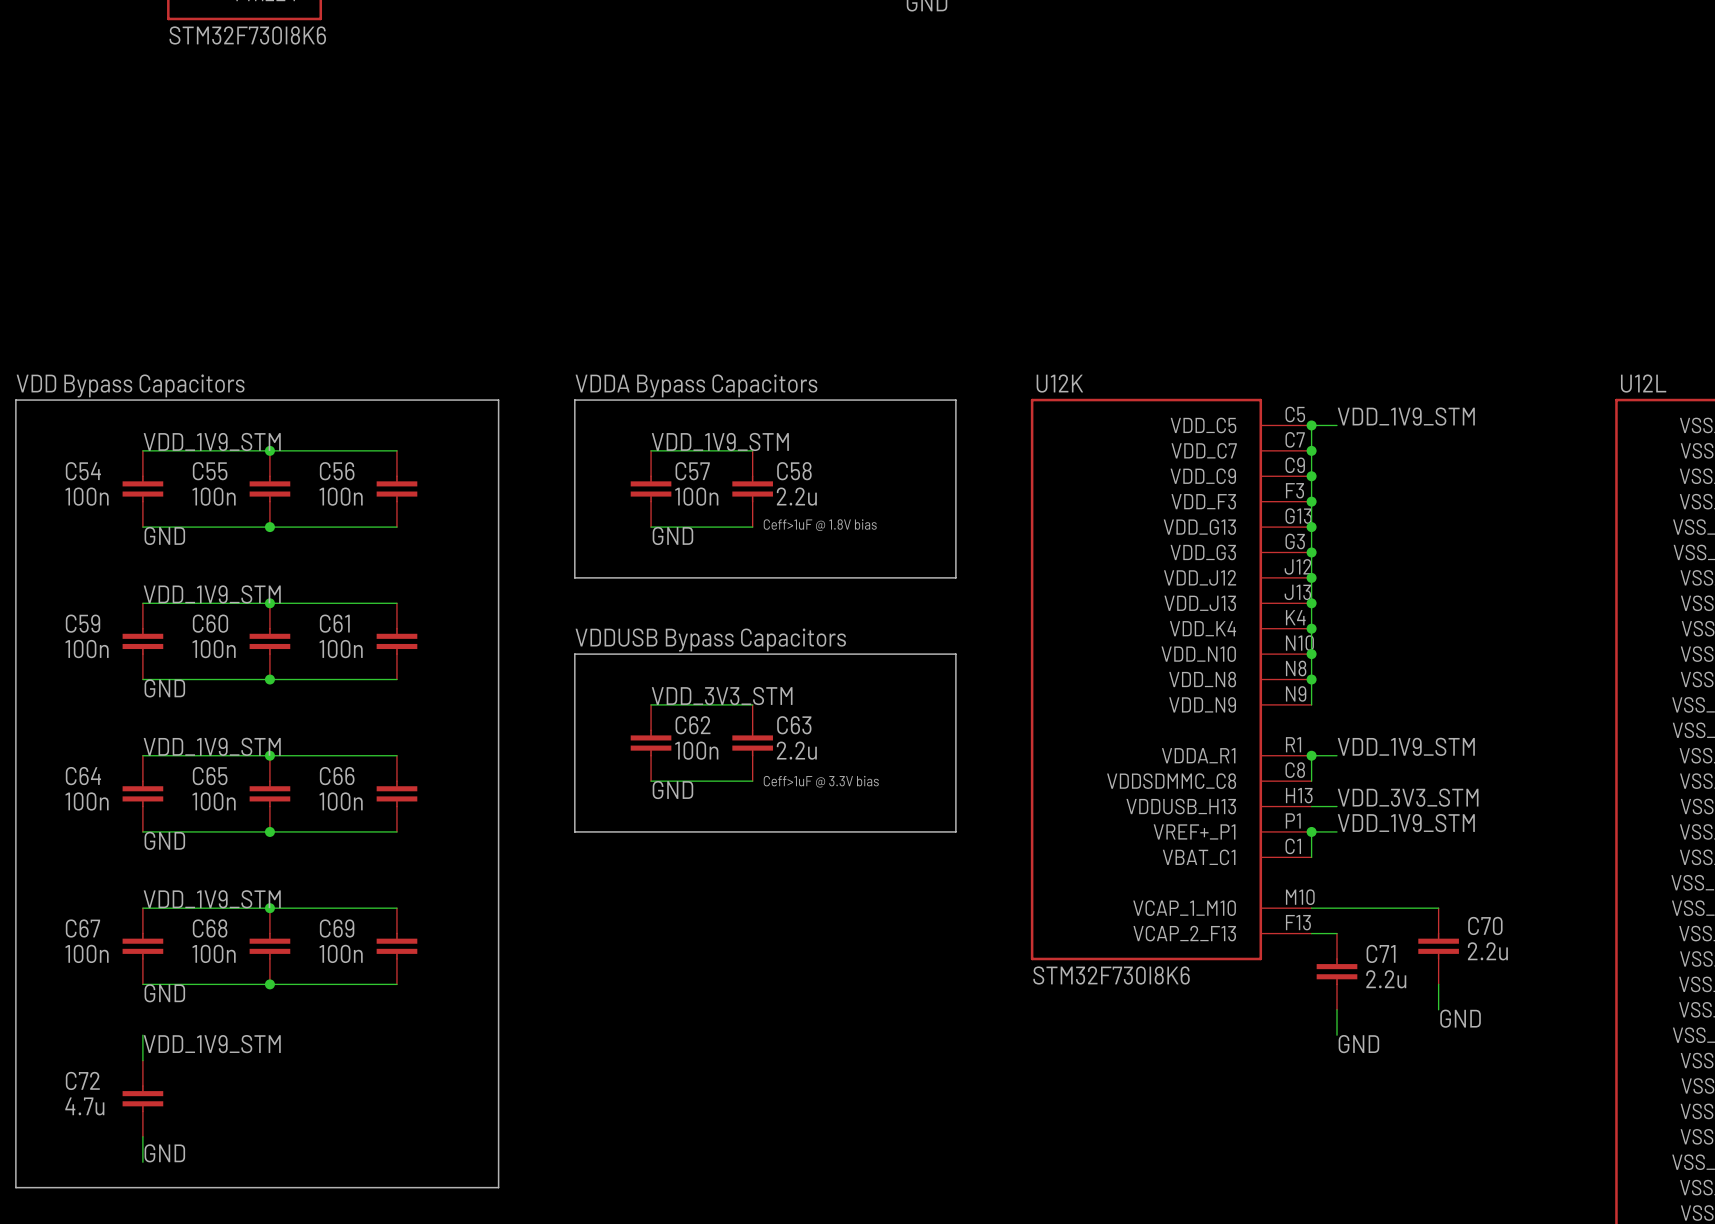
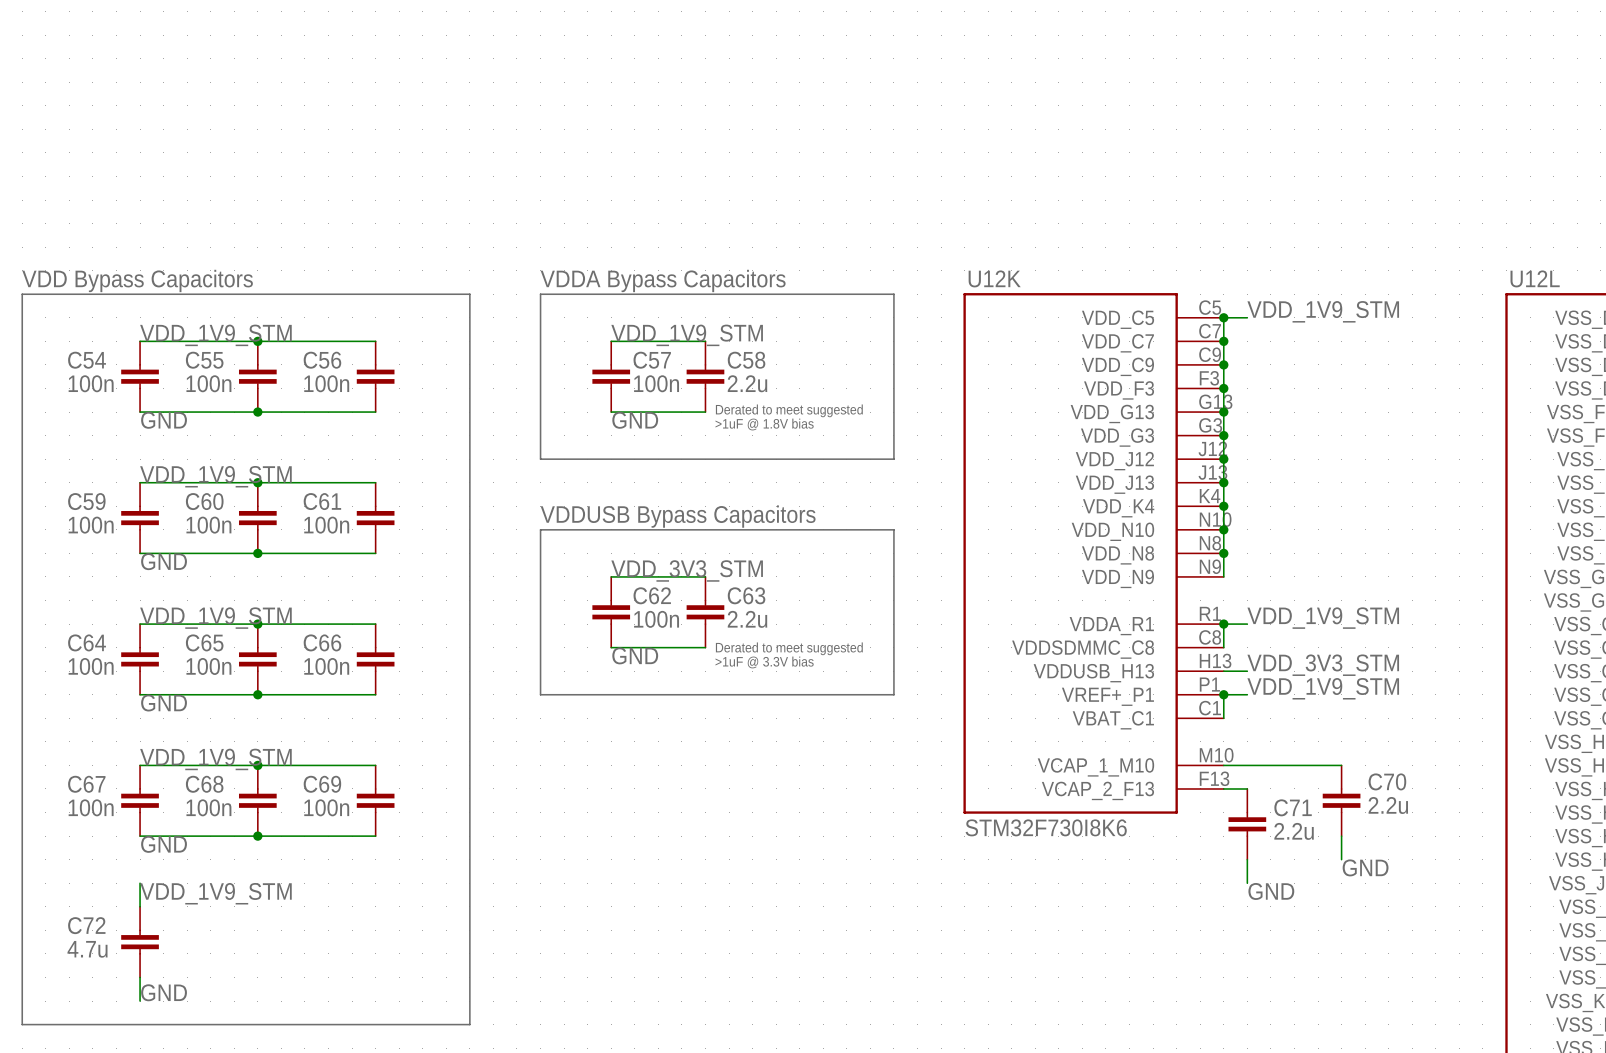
text: Ceff>1uF @ 1.8V bias (820, 525) -> Derated to meet suggested (789, 410)
text: none -> >1uF @ 1.8V bias (764, 424)
text: Ceff>1uF @ 3.3V bias (821, 781) -> Derated to meet suggested (789, 648)
text: none -> >1uF @ 3.3V bias (764, 662)

